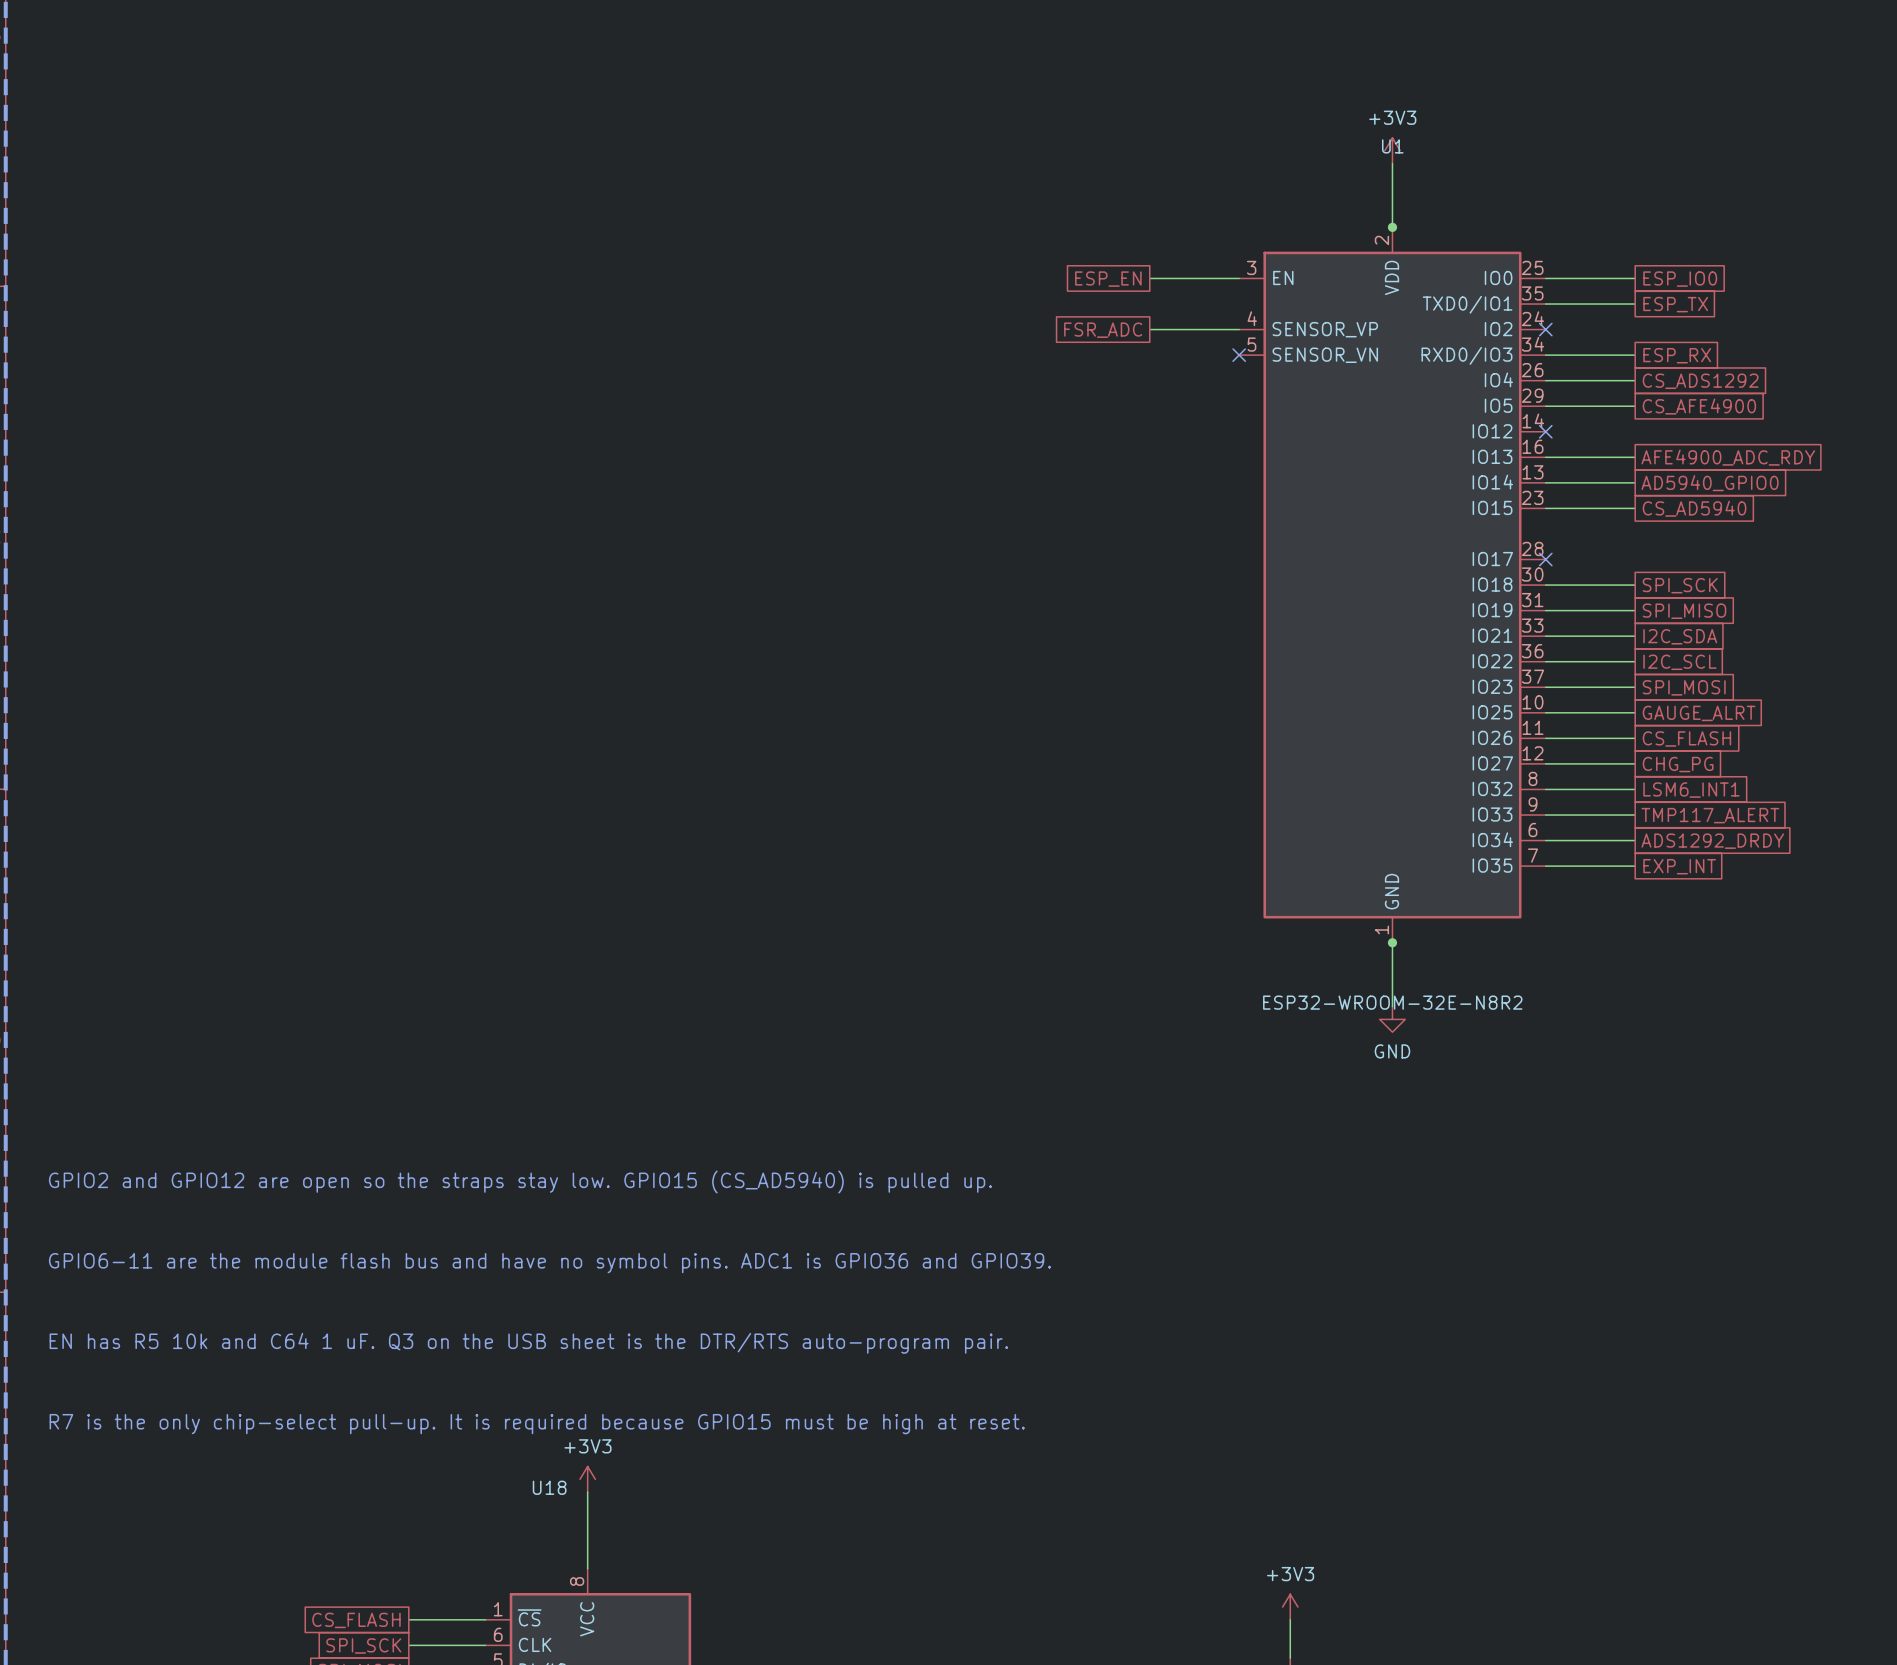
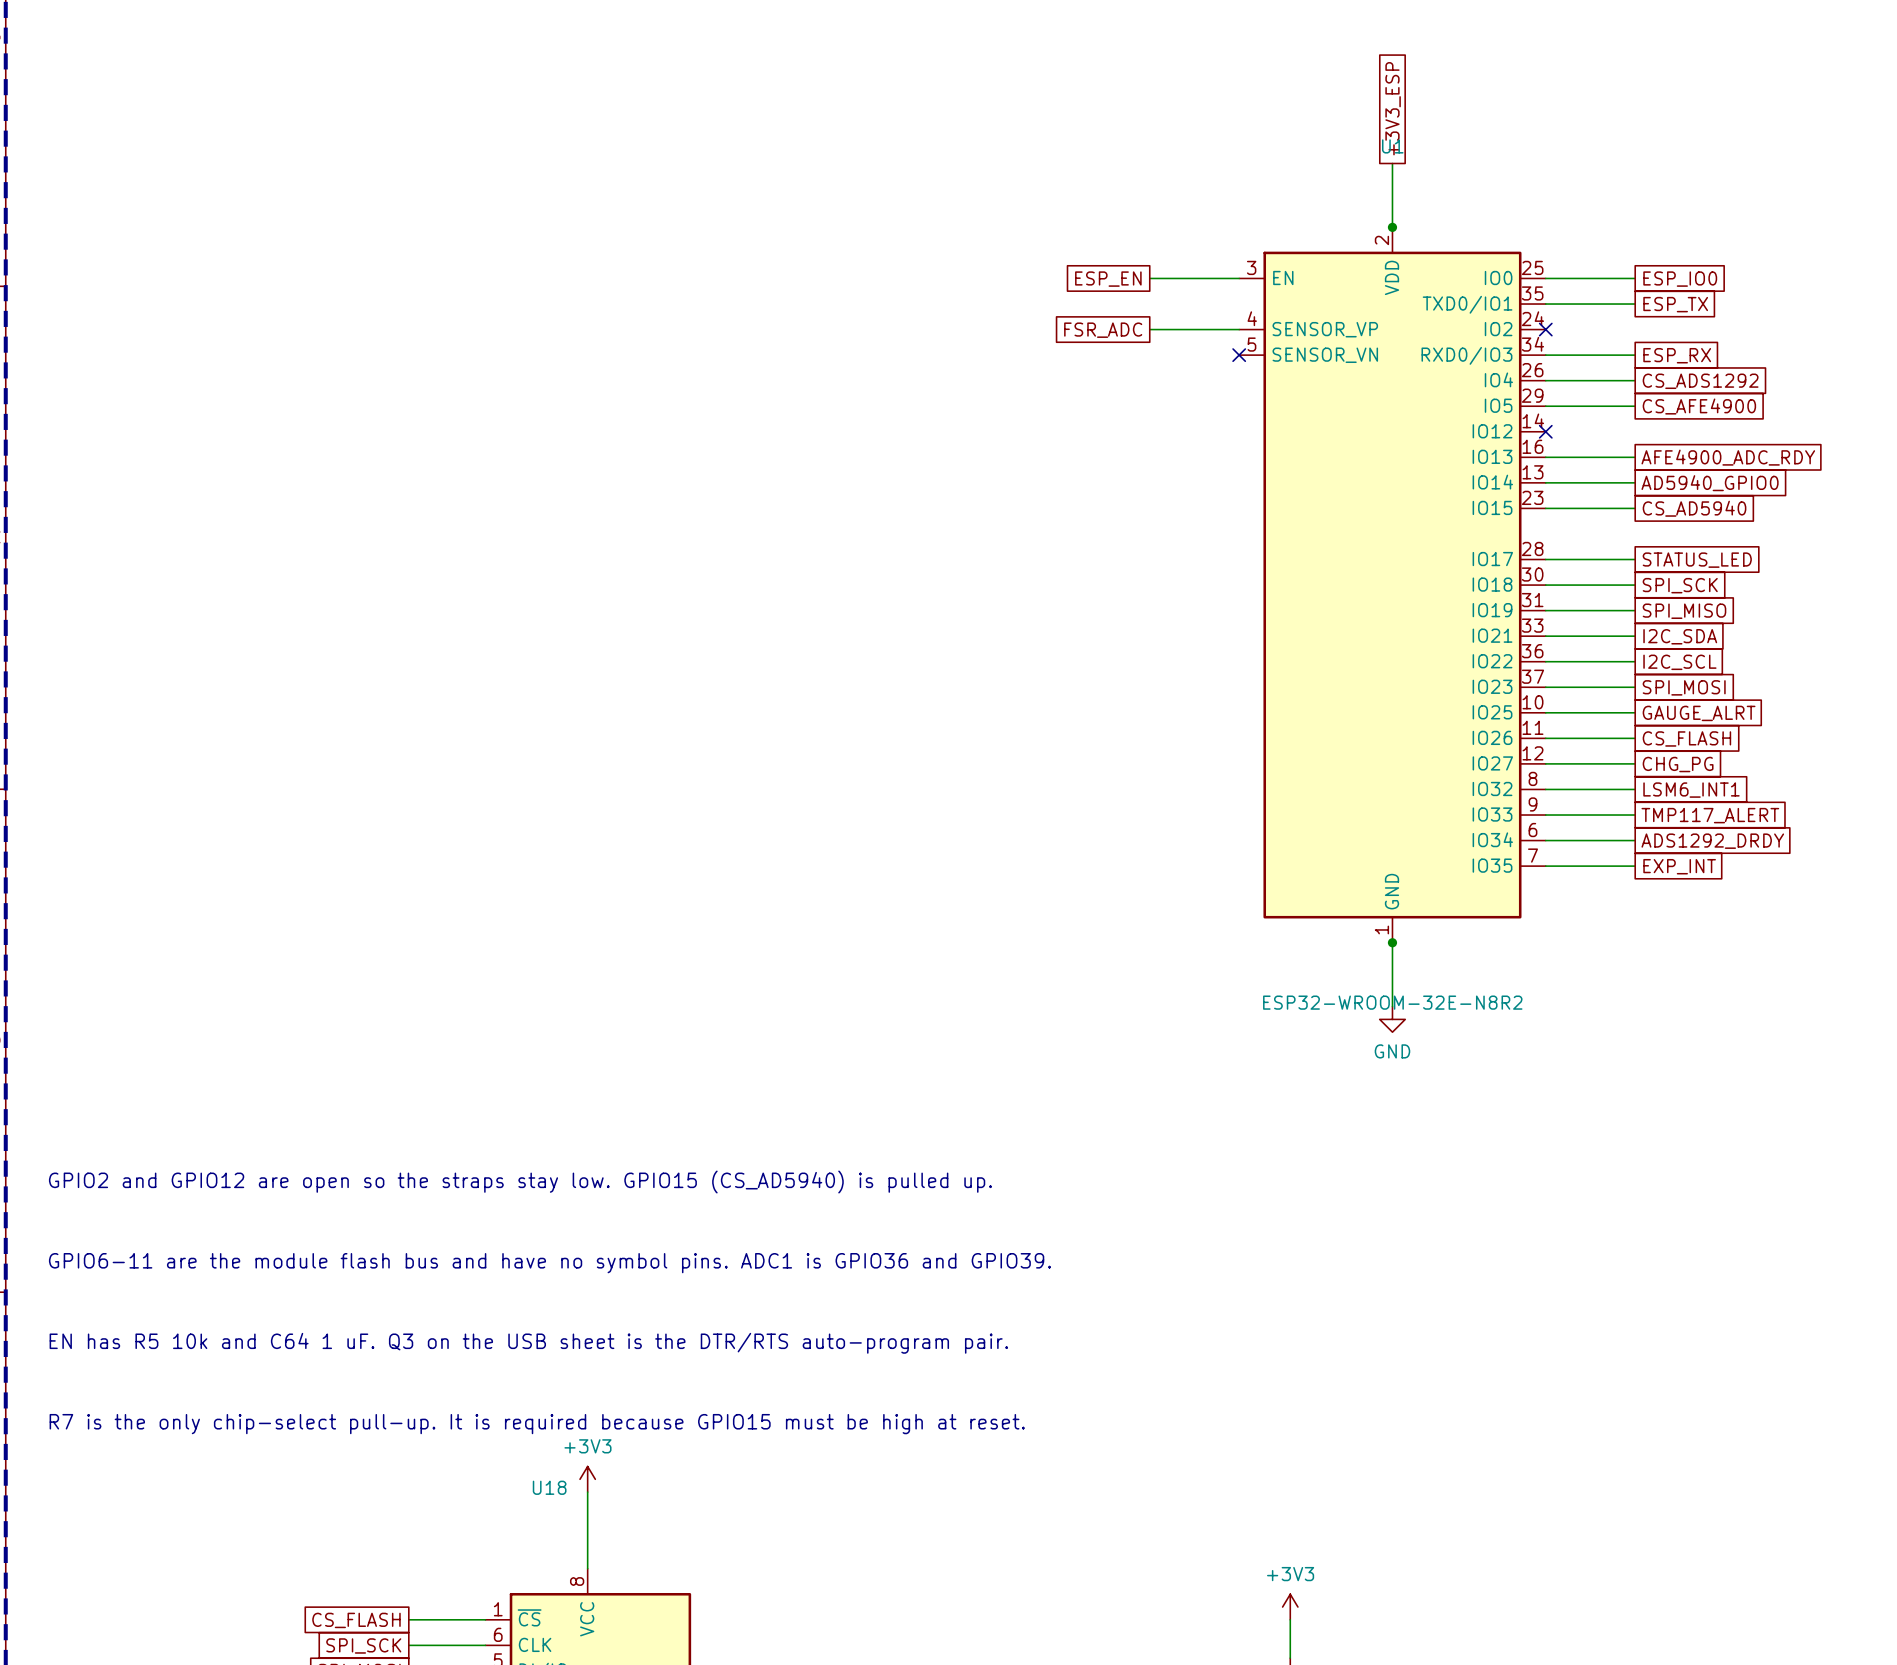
global label: none -> +3V3_ESP (1393, 108)
power symbol: +3V3 (1392, 150) -> none
wire: none -> (1545, 559) (1635, 559)
no-connect mark: (1545, 559) -> none
global label: none -> STATUS_LED (1697, 560)

